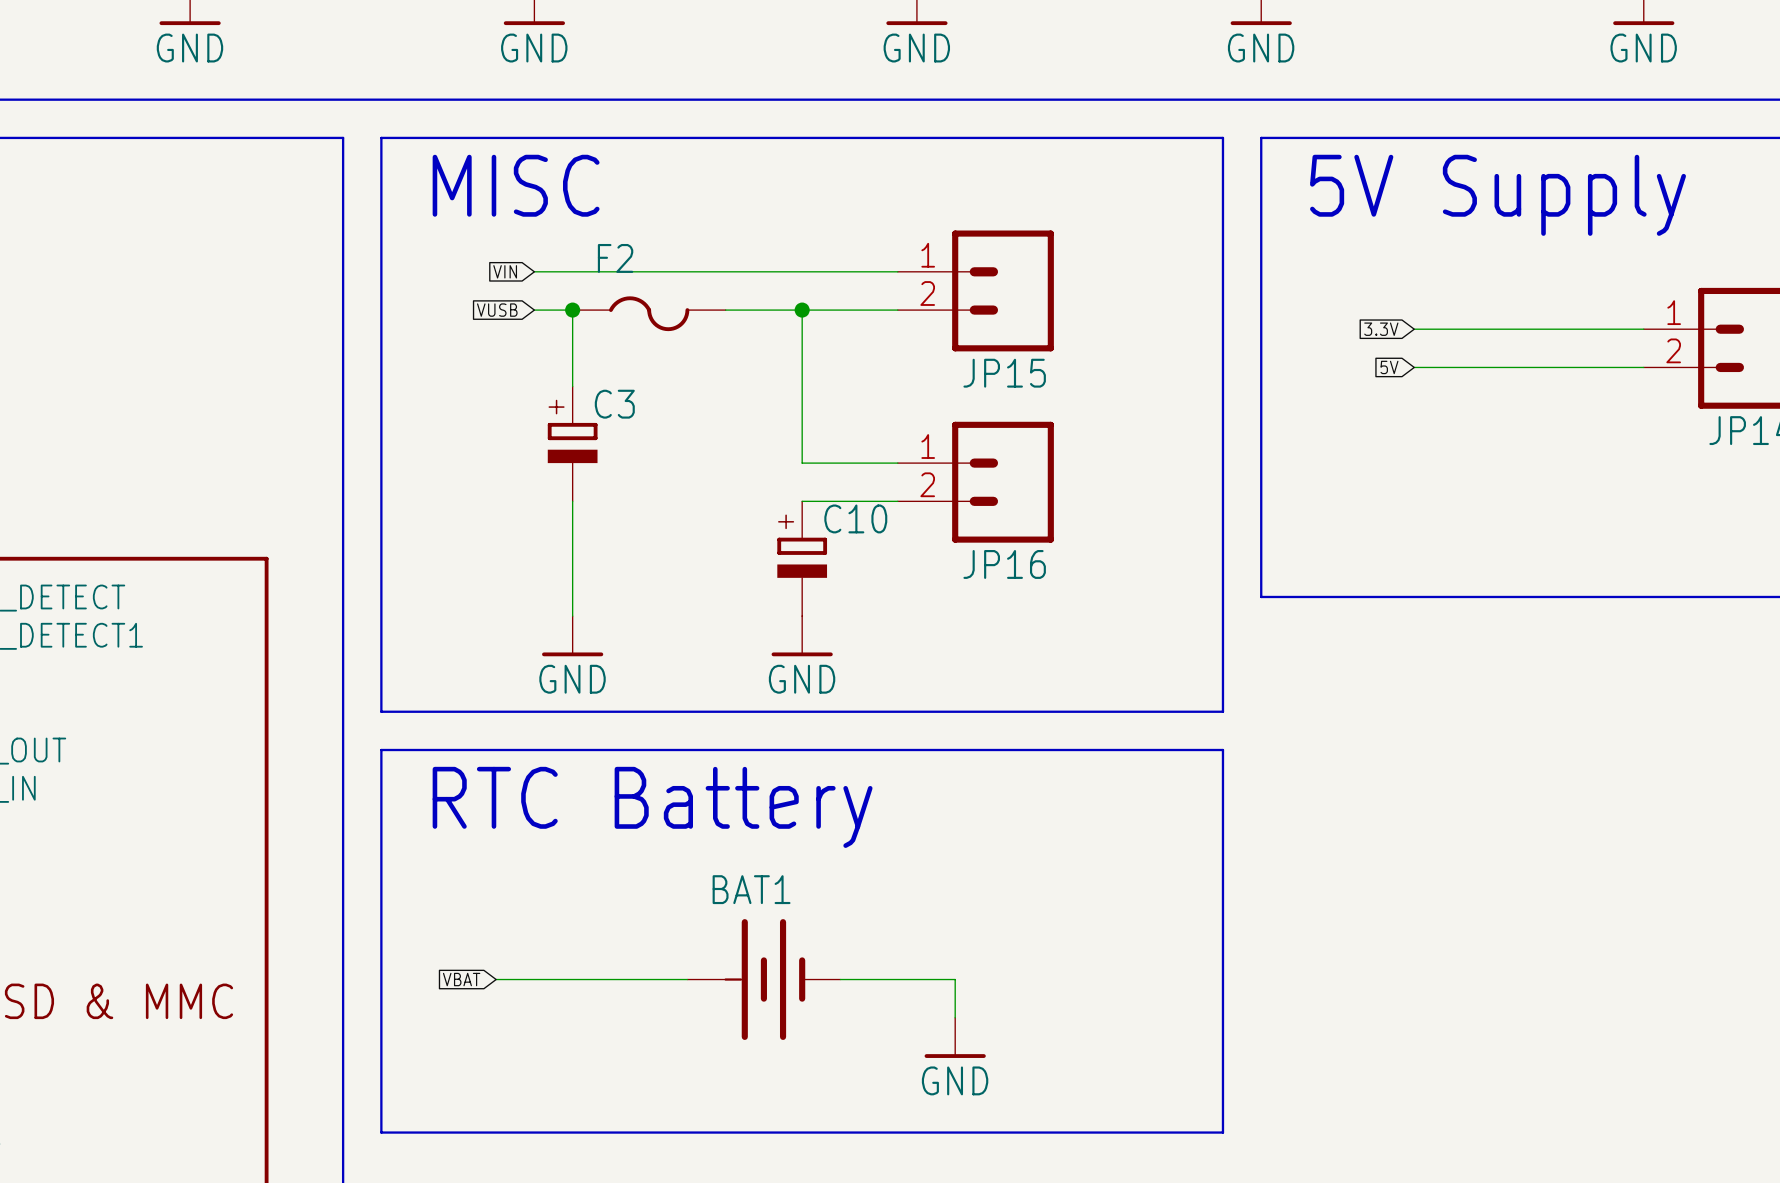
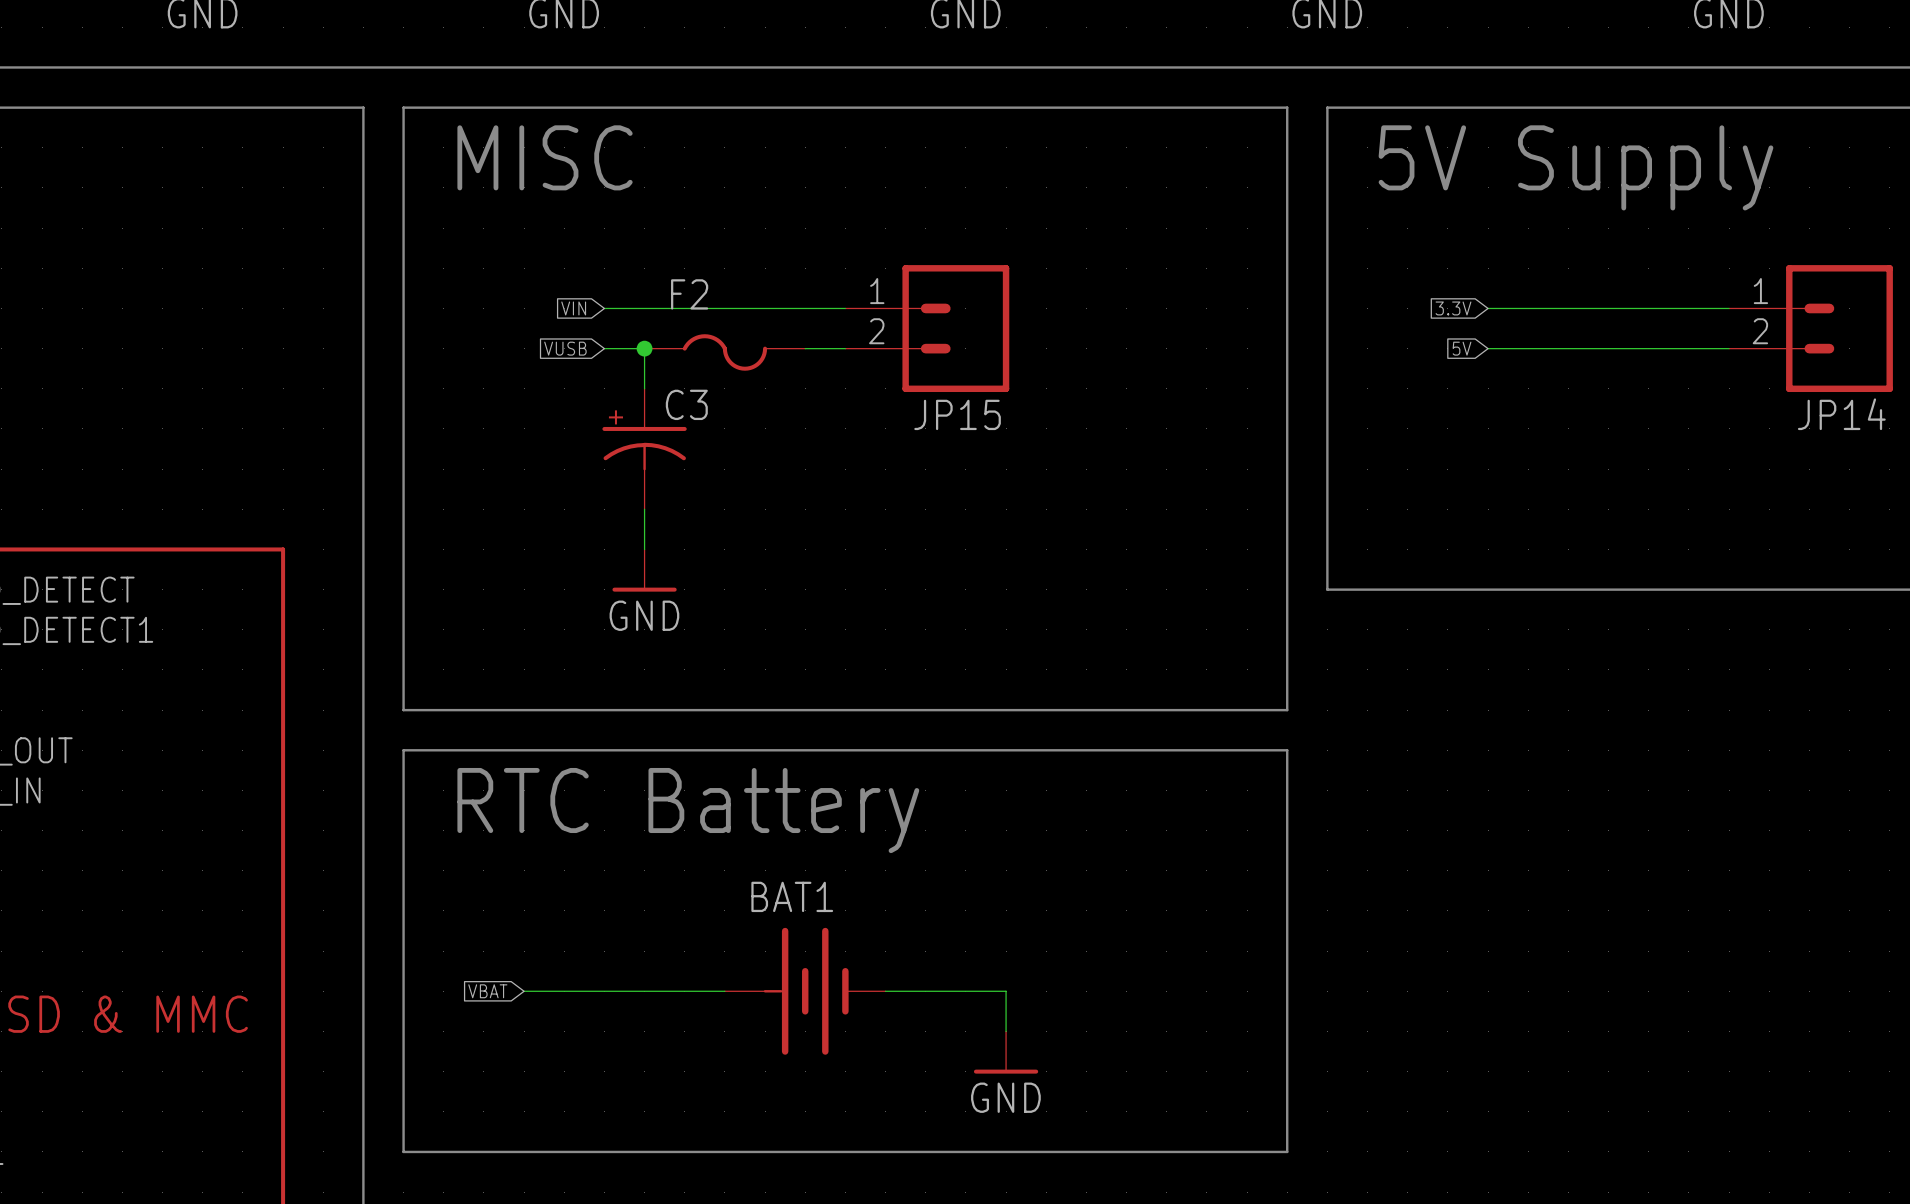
global label position: VIN (505, 271) -> VIN (573, 308)
wire: (534, 271) (897, 271) -> none
JP15 position: (975, 290) -> (927, 328)
global label position: VUSB (497, 310) -> VUSB (565, 348)
wire: (534, 310) (572, 310) (572, 386) -> none
junction position: (572, 310) -> (644, 348)
wire: (725, 310) (897, 310) -> none
wire: (802, 310) (802, 463) (897, 463) -> none
junction: (802, 310) -> none
F2 position: (649, 313) -> (724, 352)
wire: none -> (604, 308) (845, 308)
wire: none -> (604, 348) (644, 348) (644, 388)
wire: none -> (805, 348) (845, 348)
C3 symbol: [547, 386, 598, 502] -> [602, 388, 687, 510]
JP16: (975, 482) -> none
wire: (572, 501) (572, 616) -> none
wire: (802, 501) (897, 501) -> none
wire: none -> (644, 509) (644, 549)
C10: (802, 558) -> none
power symbol position: GND (572, 636) -> GND (644, 570)
power symbol: GND (802, 636) -> none

